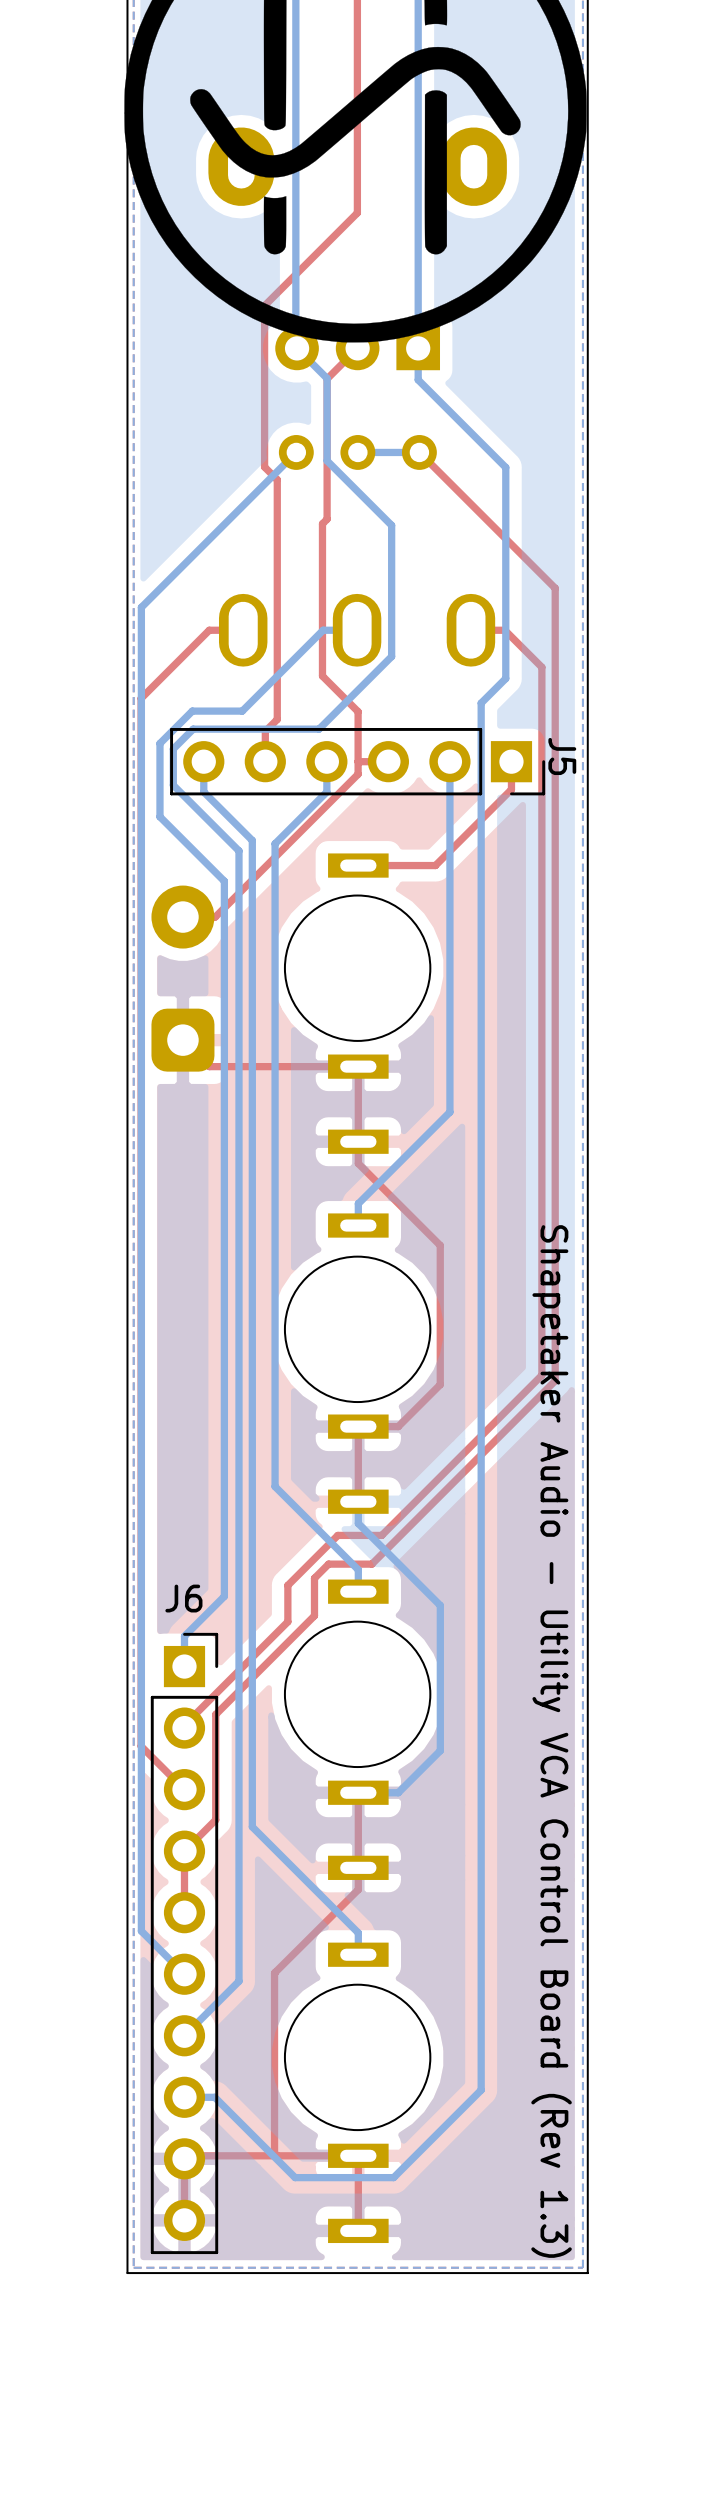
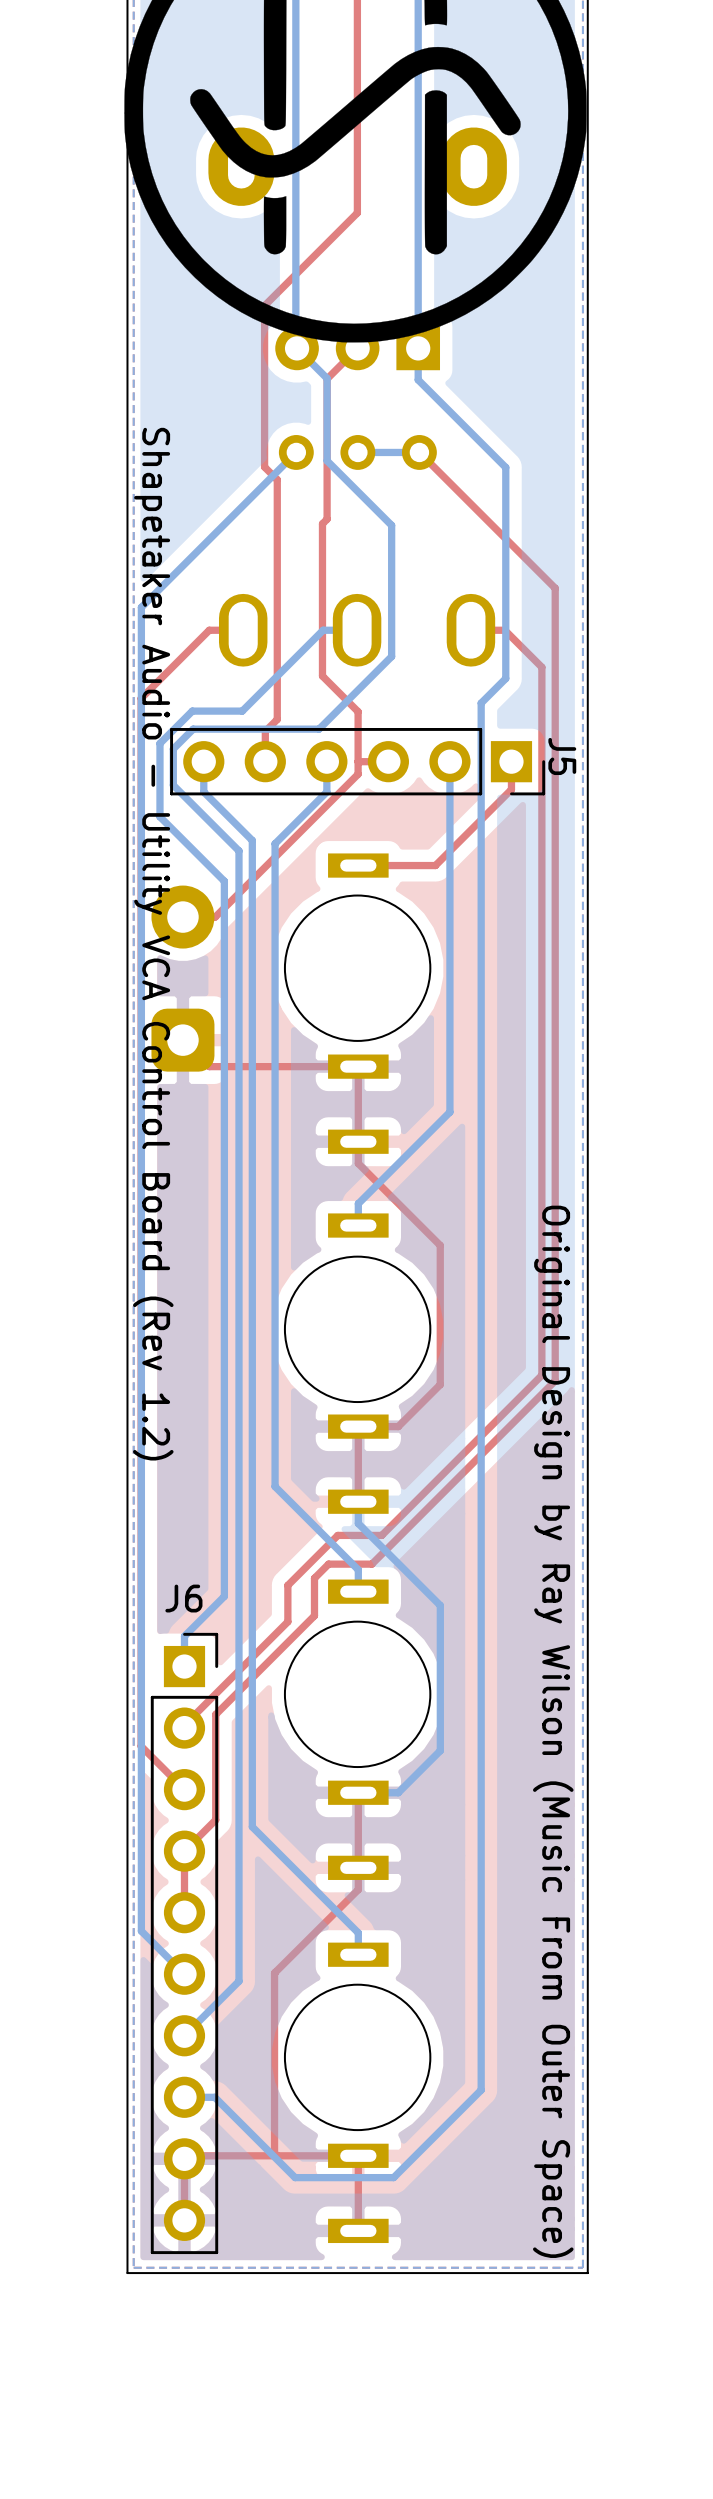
text: none -> Shapetaker Audio - Utility VCA Control Board (Rev 1.2) (153, 944)
text: Shapetaker Audio - Utility VCA Control Board (Rev 1.3) (551, 1741) -> Original Design by Ray Wilson (Music From Outer Space) (553, 1731)

